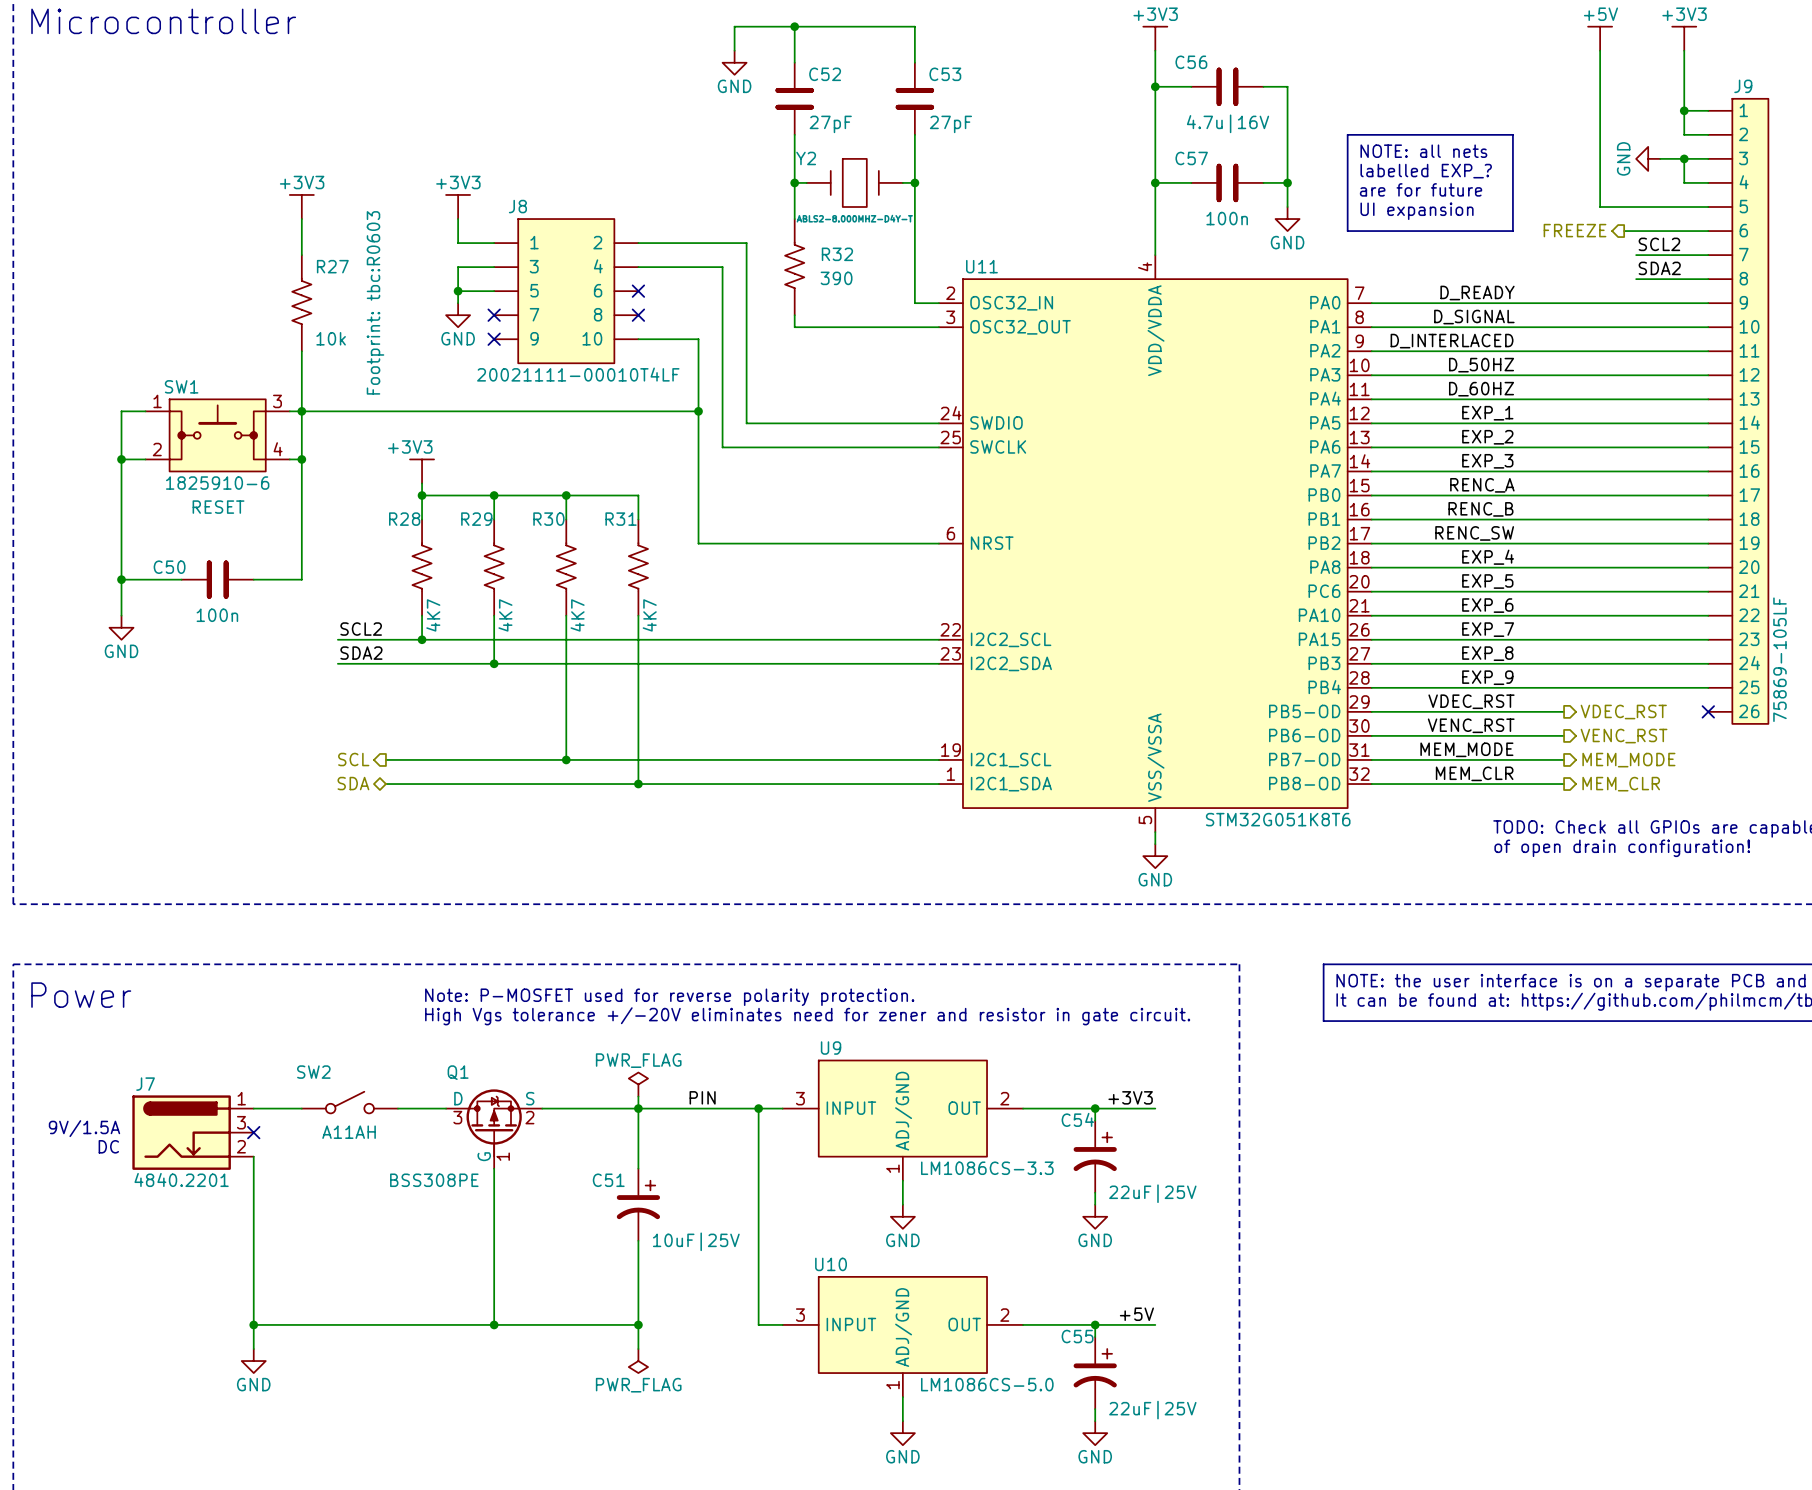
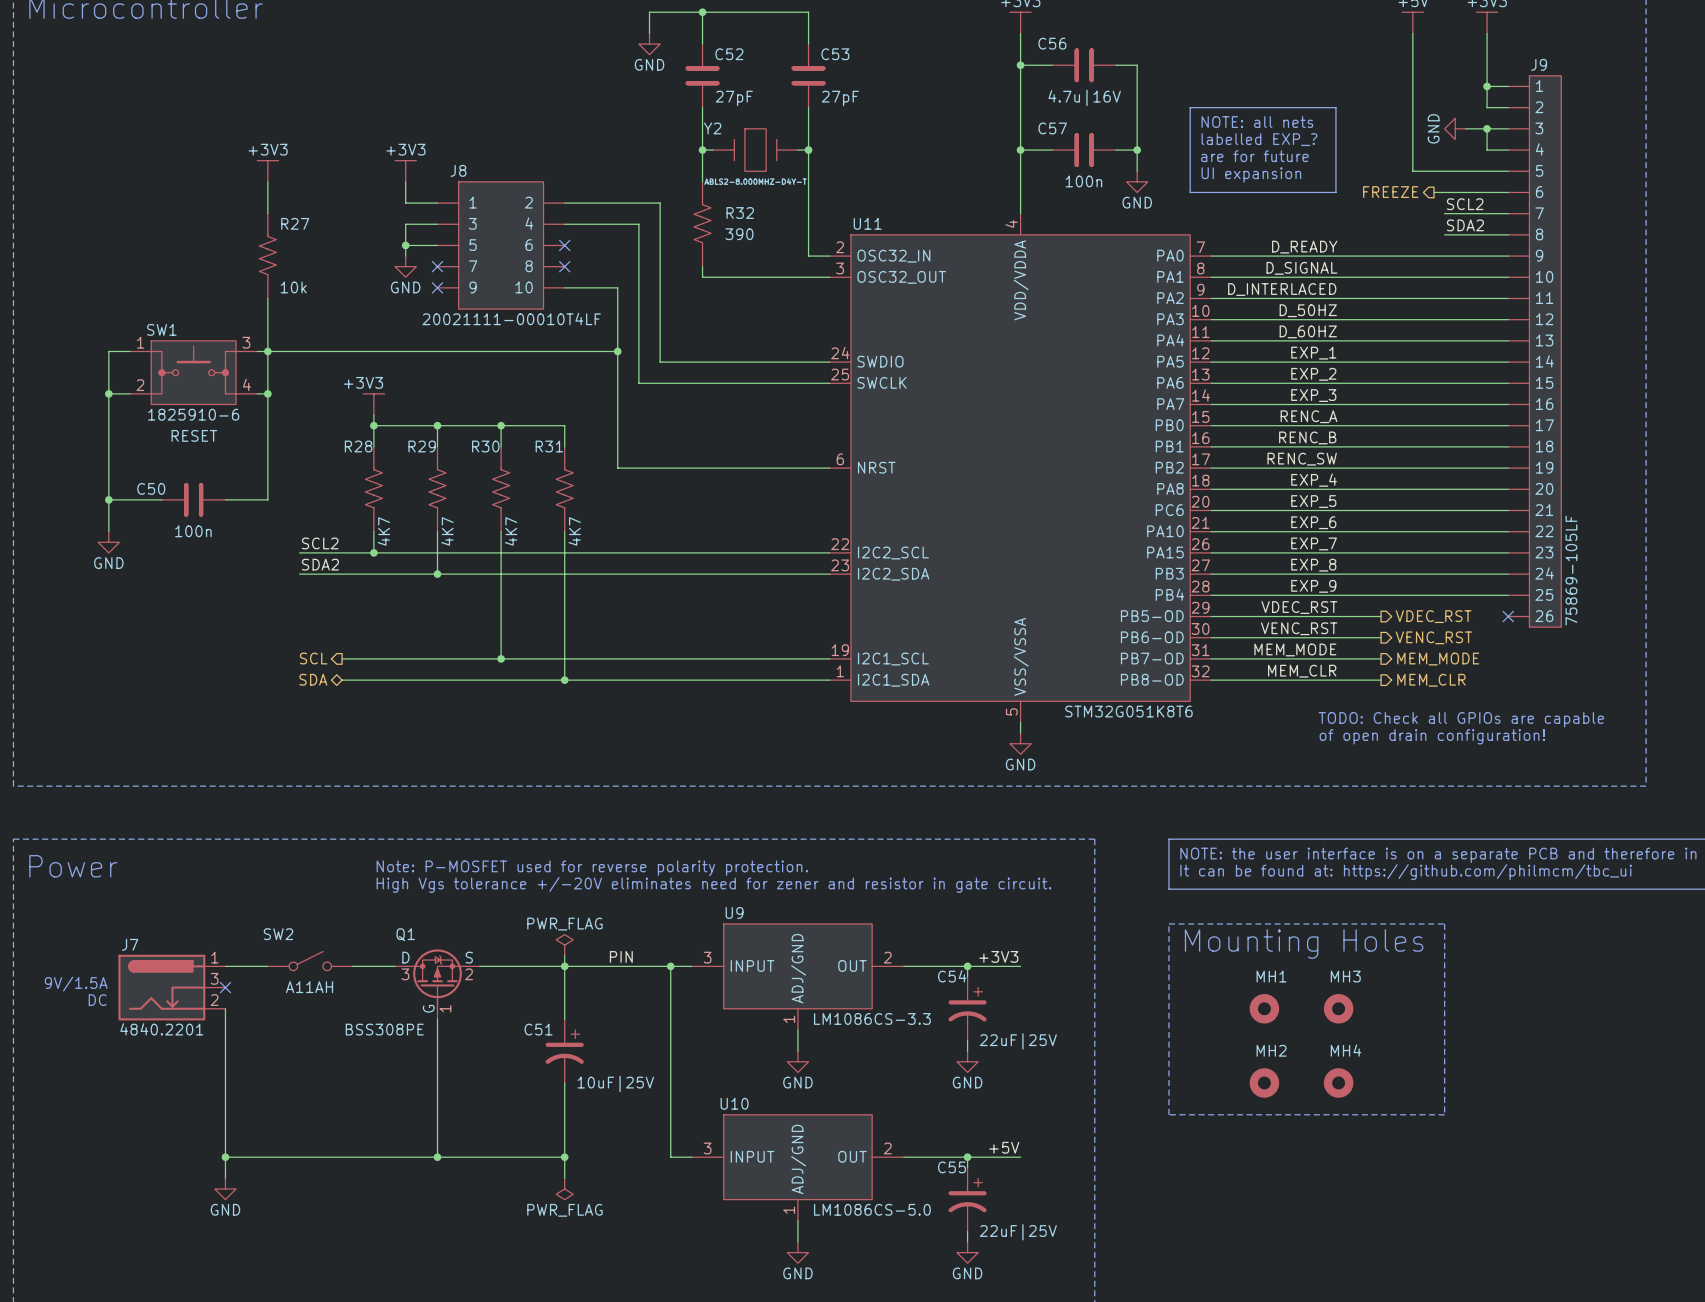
R27 text: Footprint: tbc:R0603 (375, 302) -> none
line: none -> (1169, 923) (1444, 923) (1444, 1114) (1169, 1114) (1169, 923)
text: none -> Mounting Holes (1304, 944)
MH1: none -> (1264, 1008)
MH3: none -> (1338, 1008)
MH2: none -> (1264, 1082)
MH4: none -> (1338, 1082)

